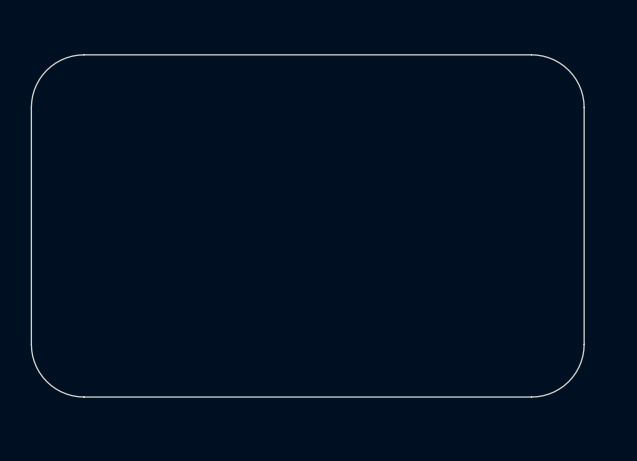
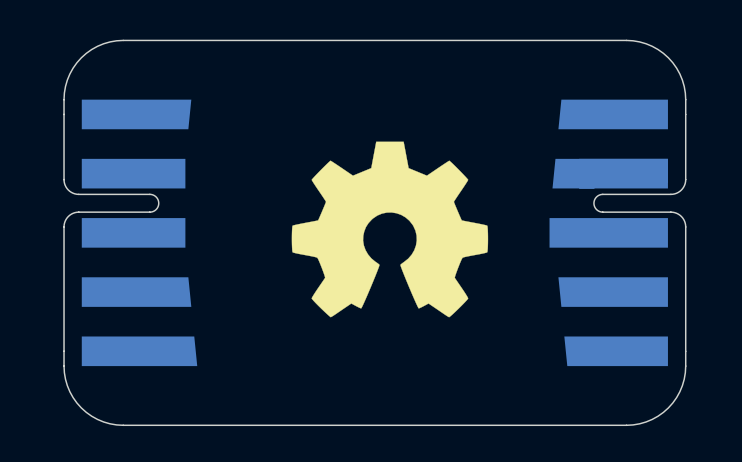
board edge: (31, 120) (31, 331) -> none
board edge: (584, 120) (584, 331) -> none
drawing: none -> [291, 141, 489, 318]
part: none -> (130, 232)
part: none -> (617, 232)

